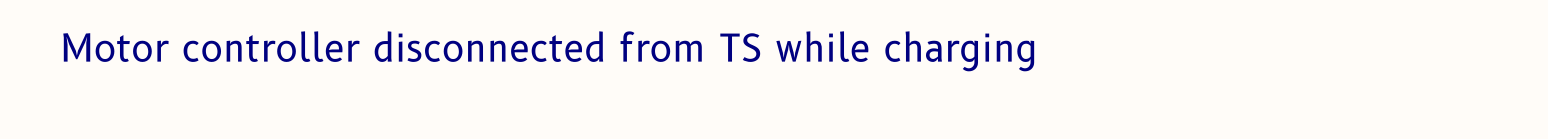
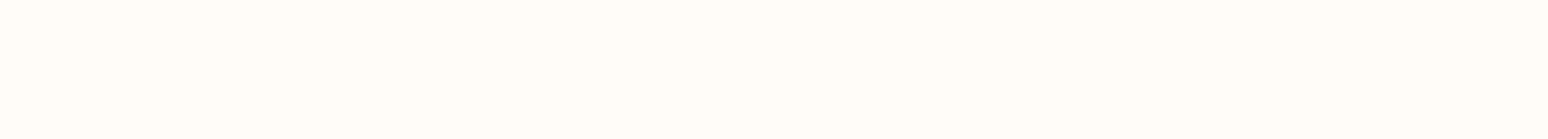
text: Motor controller disconnected from TS while charging (548, 51) -> none

